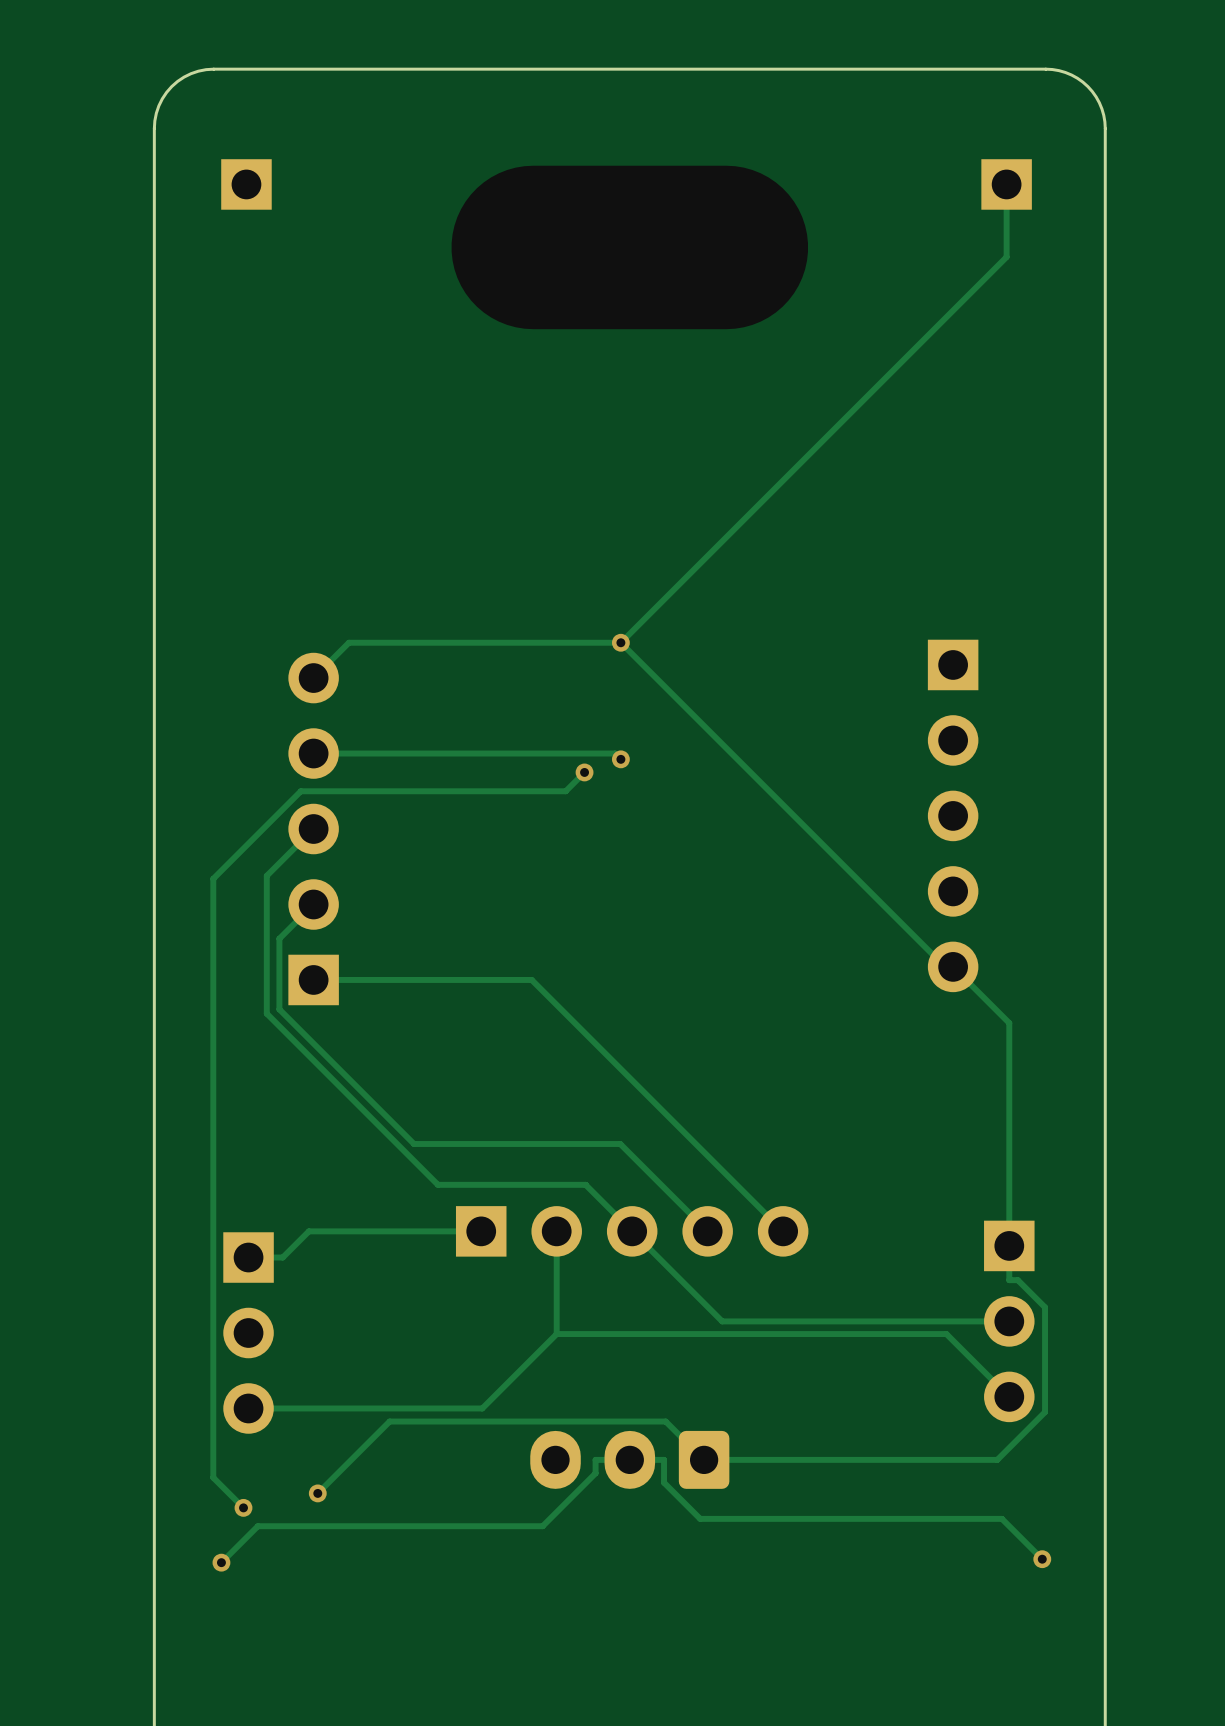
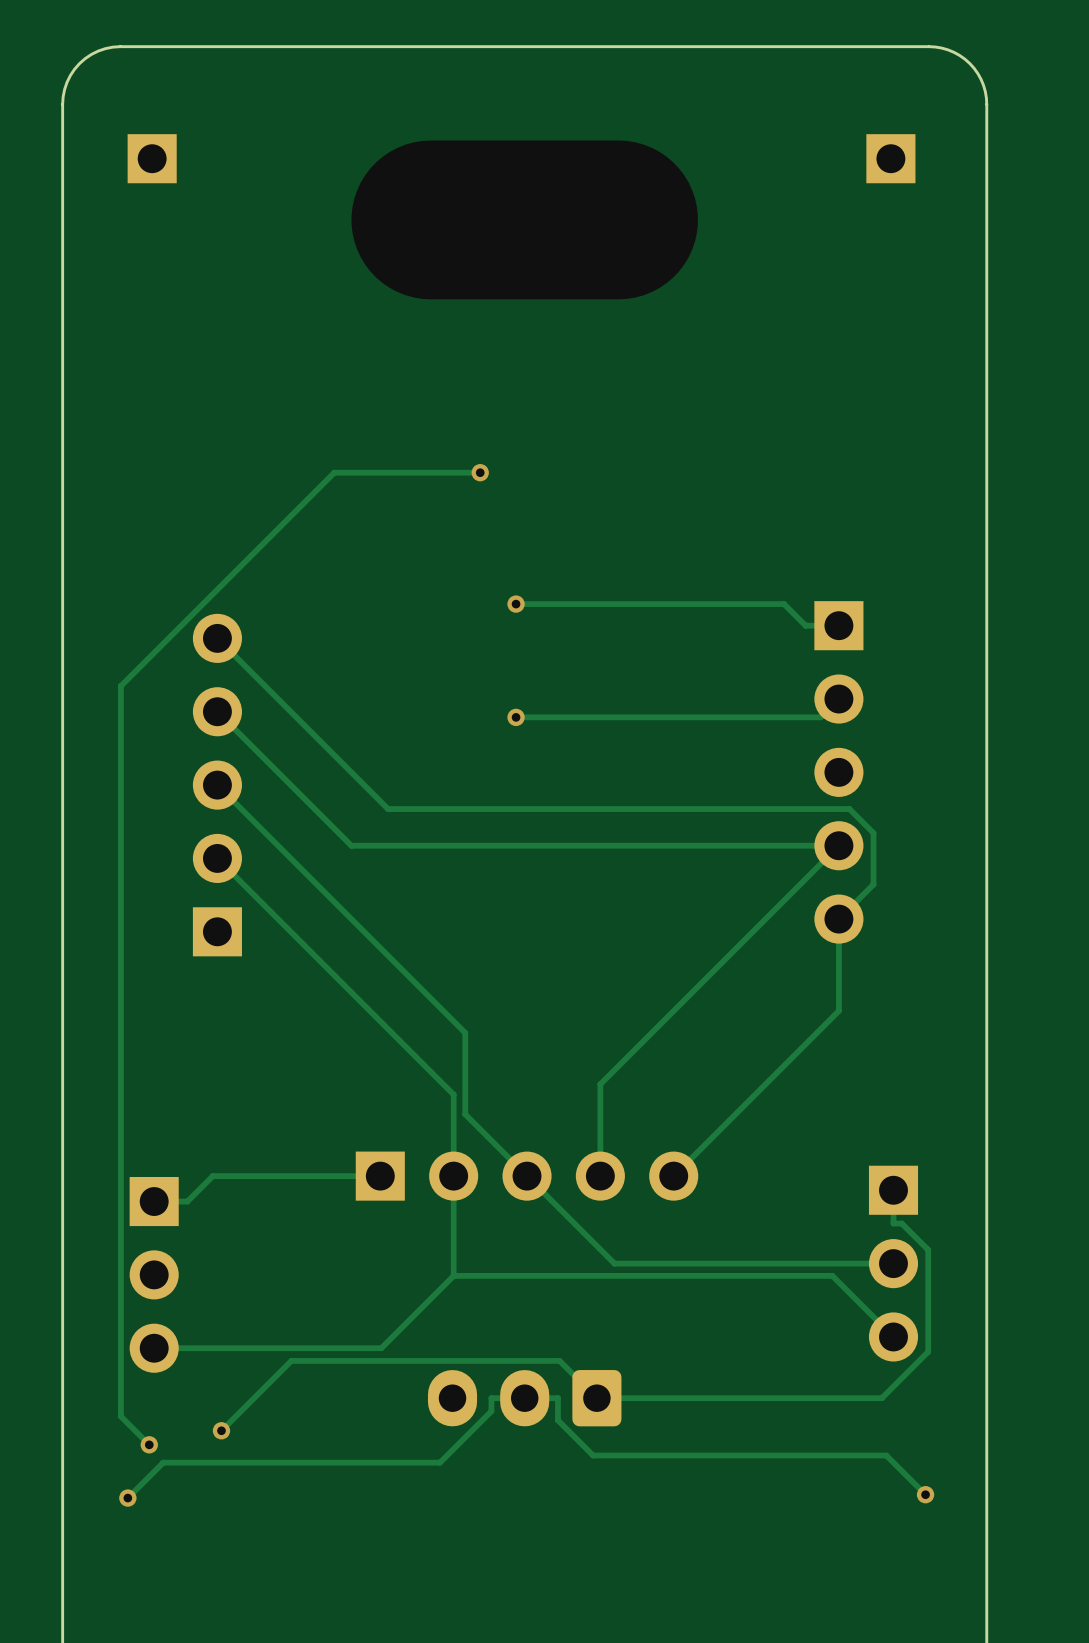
track: (1006, 184) (1006, 257) (620, 642) -> (838, 625) (805, 625) (784, 604) (516, 604)
via: none -> (480, 472)
track: (620, 642) (945, 966) (953, 966) (1009, 1023) (1009, 1245) -> none
track: (620, 642) (348, 642) (313, 678) -> none
track: (313, 753) (615, 753) (620, 759) -> (838, 699) (820, 717) (516, 717)
track: (584, 772) (565, 791) (300, 791) (213, 878) (214, 1478) -> (480, 472) (334, 472) (120, 686) (120, 1416)
via: (584, 772) -> none
track: (313, 829) (266, 875) (266, 1013) (437, 1184) (585, 1184) -> (217, 785) (465, 1032) (465, 1114) (481, 1130)
track: (313, 904) (279, 938) (279, 1009) (414, 1143) (620, 1143) (707, 1231) -> (217, 711) (351, 845) (838, 845) (600, 1084) (600, 1176)
track: none -> (217, 858) (453, 1094) (453, 1176)
track: (313, 979) (531, 979) (783, 1231) -> (217, 638) (388, 809) (849, 809) (873, 833) (873, 884) (838, 919) (838, 1010) (673, 1176)

